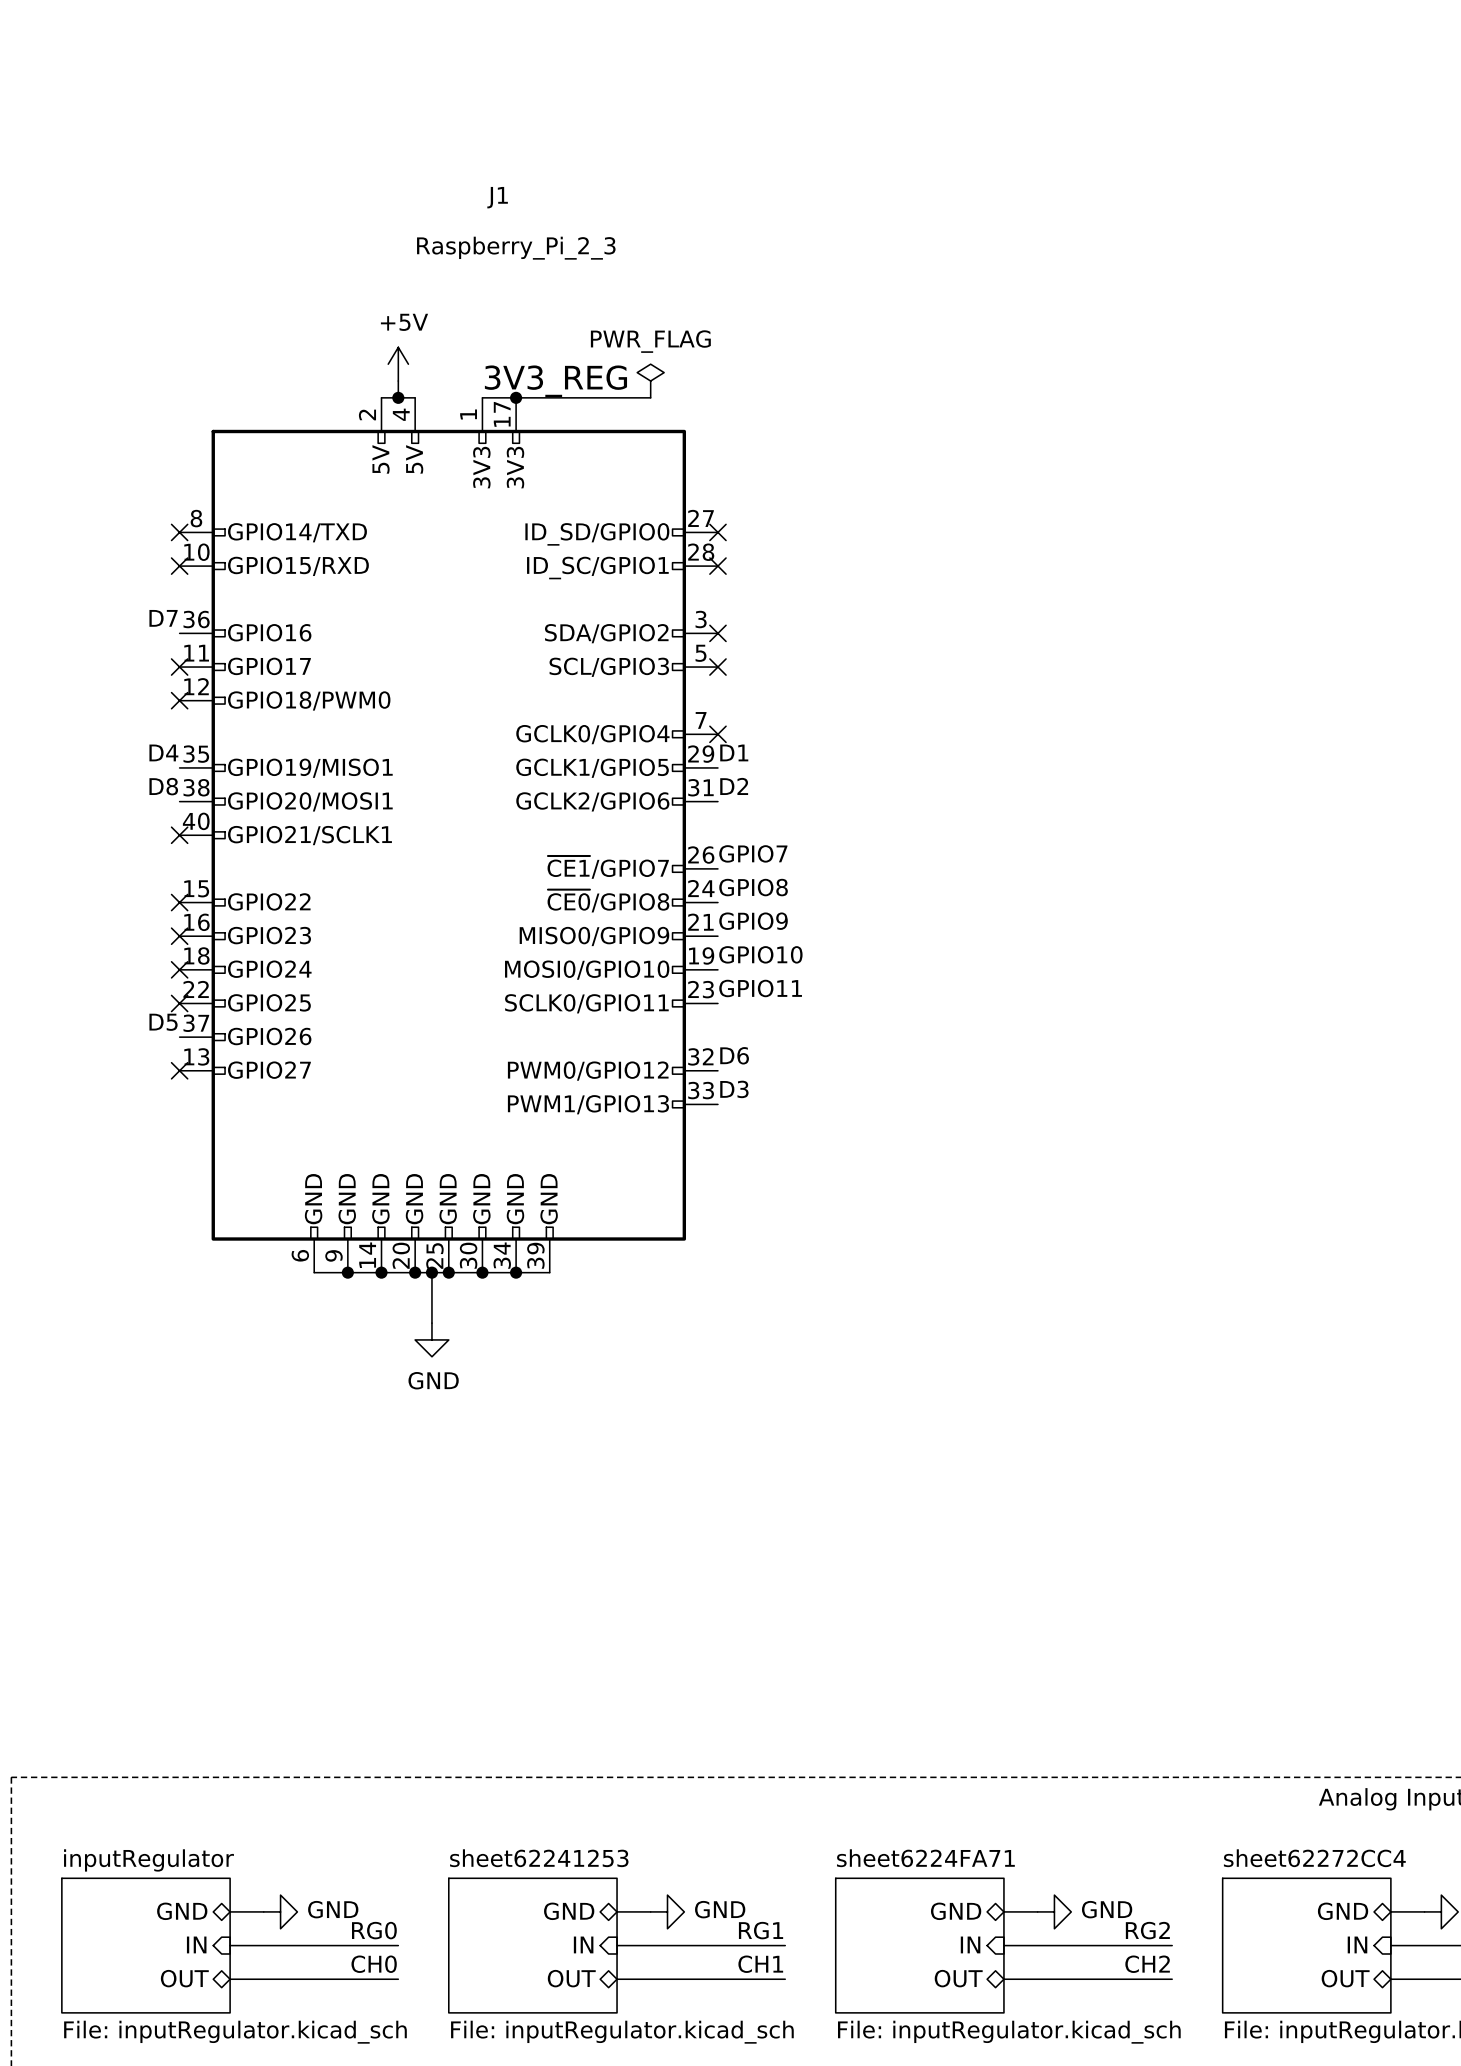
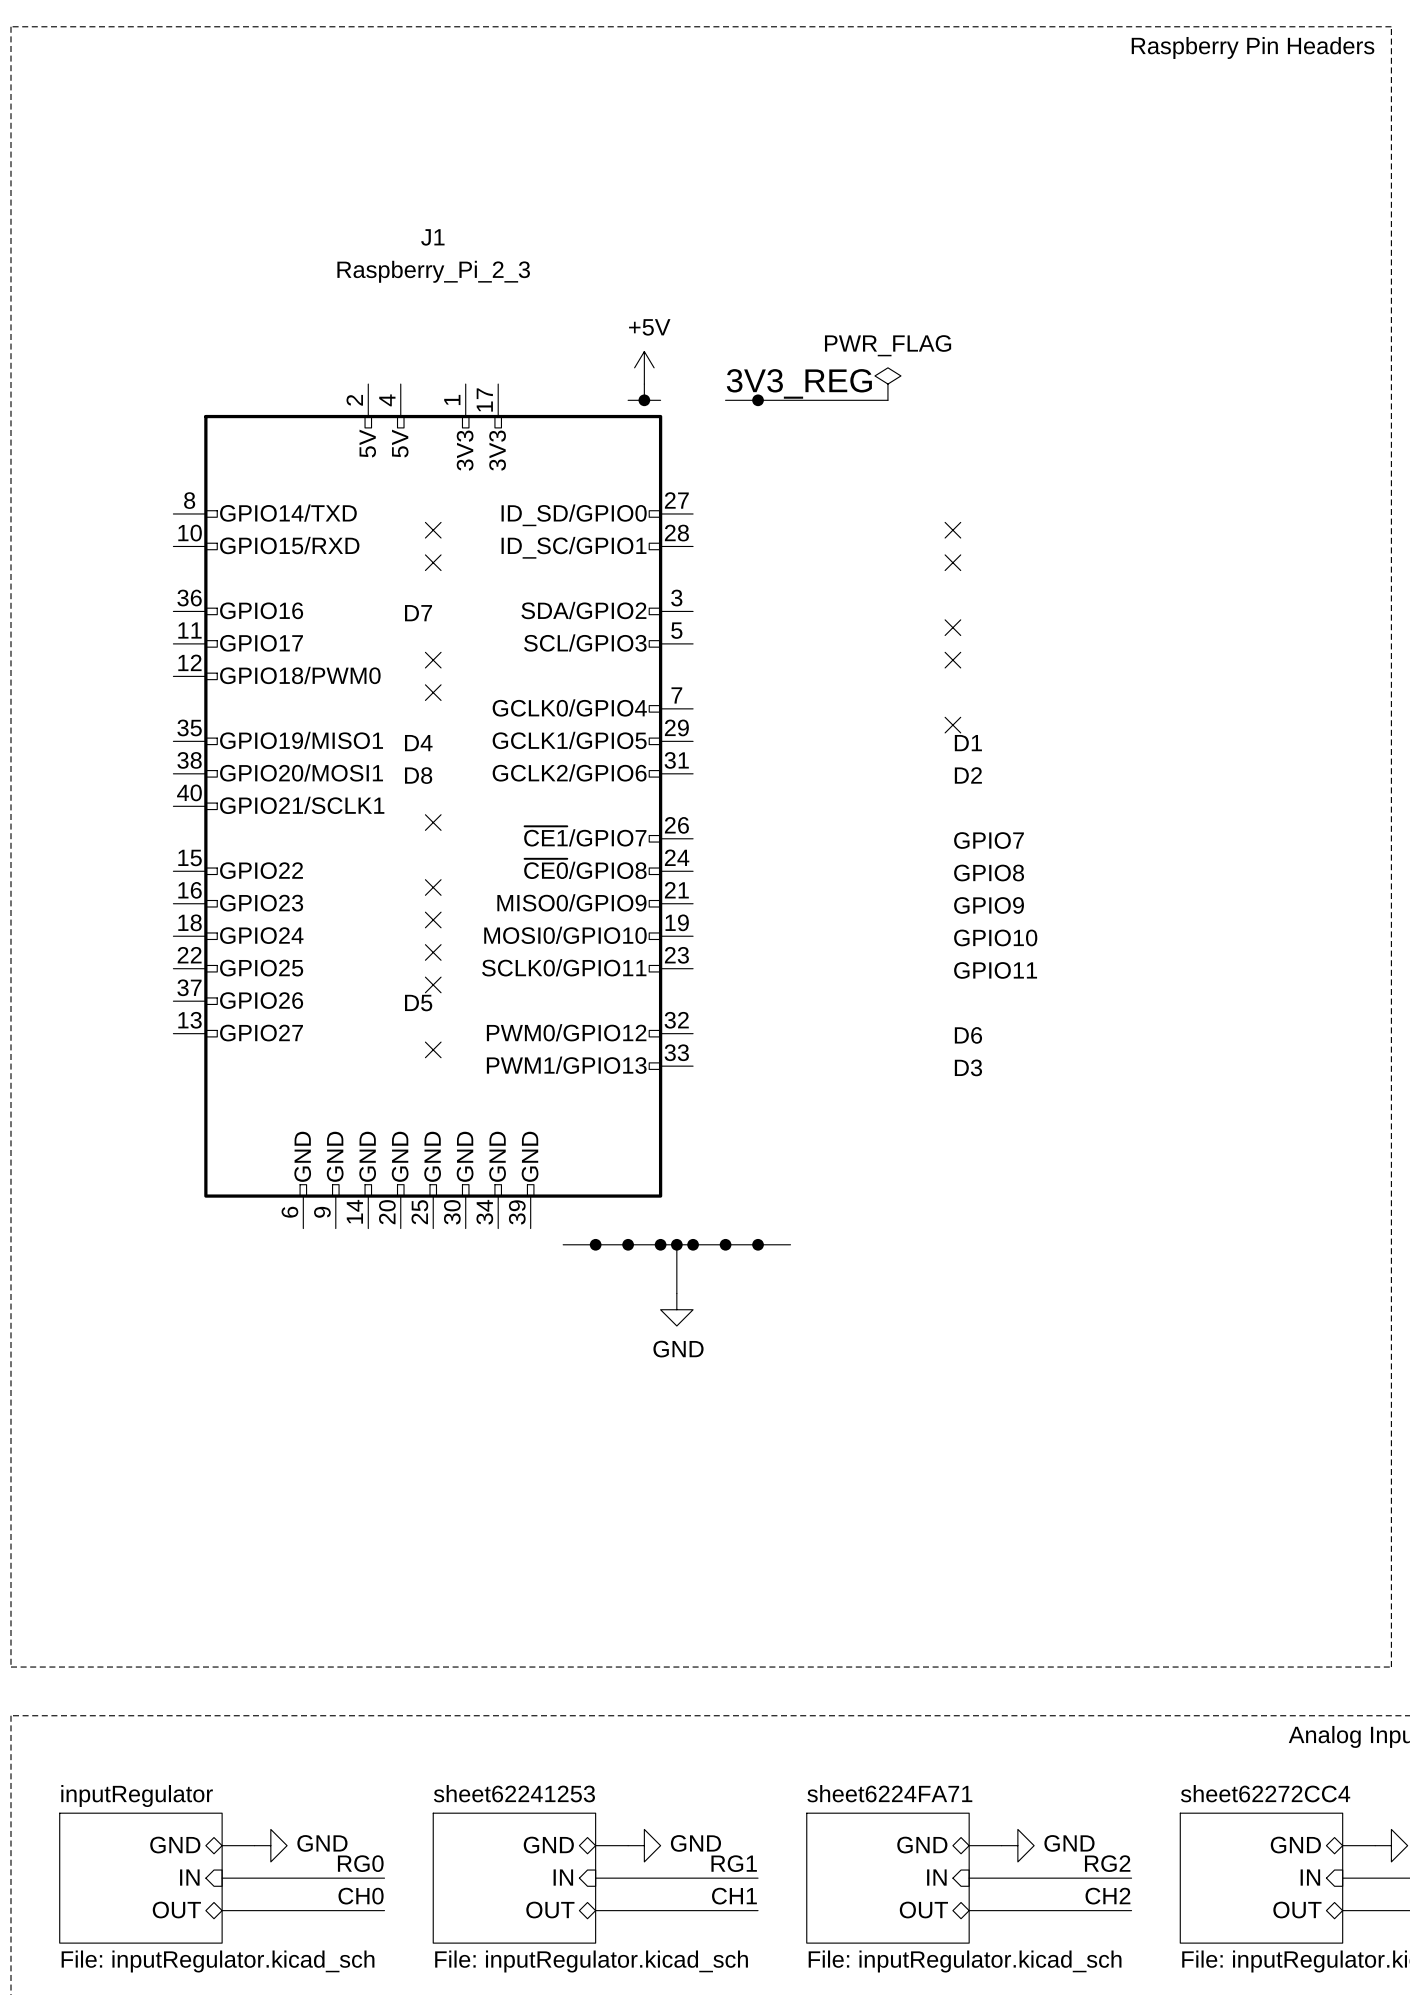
line: none -> (11, 26) (11, 1667) (1391, 1667) (1391, 26) (11, 26)
text: none -> Raspberry Pin Headers (1253, 47)
J1 name position: J1 (497, 197) -> J1 (432, 237)
J1 value position: Raspberry_Pi_2_3 (516, 248) -> Raspberry_Pi_2_3 (433, 271)
power symbol position: +5V (398, 364) -> +5V (644, 367)
wire: (398, 381) (398, 397) -> (644, 384) (644, 400)
label position: 3V3_REG (555, 381) -> 3V3_REG (799, 383)
power symbol position: PWR_FLAG (650, 381) -> PWR_FLAG (887, 384)
wire: (381, 397) (415, 397) -> (628, 400) (660, 400)
junction: (398, 397) -> none
wire: (482, 397) (650, 397) -> (725, 400) (887, 400)
junction: (516, 397) -> none
junction: none -> (644, 400)
junction: none -> (758, 400)
no-connect mark: (179, 532) -> none
no-connect mark: (717, 532) -> none
no-connect mark: none -> (433, 530)
no-connect mark: none -> (952, 530)
no-connect mark: (179, 566) -> none
no-connect mark: (717, 566) -> none
no-connect mark: none -> (433, 562)
no-connect mark: none -> (952, 562)
label position: D7 (163, 618) -> D7 (418, 613)
no-connect mark: (717, 633) -> none
no-connect mark: none -> (952, 627)
no-connect mark: (179, 667) -> none
no-connect mark: (717, 667) -> none
no-connect mark: none -> (433, 660)
no-connect mark: none -> (952, 660)
no-connect mark: (179, 700) -> none
no-connect mark: none -> (433, 692)
no-connect mark: (717, 734) -> none
no-connect mark: none -> (952, 725)
label position: D4 (163, 752) -> D4 (418, 743)
label position: D1 (734, 752) -> D1 (968, 743)
label position: D8 (163, 786) -> D8 (418, 775)
label position: D2 (734, 786) -> D2 (968, 775)
no-connect mark: (179, 835) -> none
no-connect mark: none -> (433, 822)
label position: GPIO7 (753, 853) -> GPIO7 (989, 840)
label position: GPIO8 (753, 887) -> GPIO8 (989, 873)
no-connect mark: (179, 902) -> none
no-connect mark: none -> (433, 887)
label position: GPIO9 (753, 921) -> GPIO9 (989, 905)
no-connect mark: (179, 936) -> none
no-connect mark: none -> (433, 919)
label position: GPIO10 (760, 954) -> GPIO10 (995, 937)
no-connect mark: (179, 969) -> none
no-connect mark: none -> (433, 952)
label position: GPIO11 (760, 988) -> GPIO11 (995, 970)
no-connect mark: (179, 1003) -> none
no-connect mark: none -> (433, 984)
label position: D5 (163, 1022) -> D5 (418, 1003)
label position: D6 (734, 1055) -> D6 (968, 1035)
no-connect mark: (179, 1070) -> none
no-connect mark: none -> (433, 1049)
label position: D3 (734, 1089) -> D3 (968, 1067)
wire: (314, 1272) (549, 1272) -> (563, 1244) (790, 1244)
junction: (347, 1272) -> none
junction: (381, 1272) -> none
junction: (415, 1272) -> none
wire: (431, 1272) (431, 1323) -> (676, 1244) (676, 1293)
junction: (431, 1272) -> none
junction: (448, 1272) -> none
junction: (482, 1272) -> none
junction: (516, 1272) -> none
junction: none -> (595, 1244)
junction: none -> (628, 1244)
junction: none -> (660, 1244)
junction: none -> (676, 1244)
junction: none -> (693, 1244)
junction: none -> (725, 1244)
junction: none -> (758, 1244)
power symbol position: GND (431, 1339) -> GND (676, 1309)

